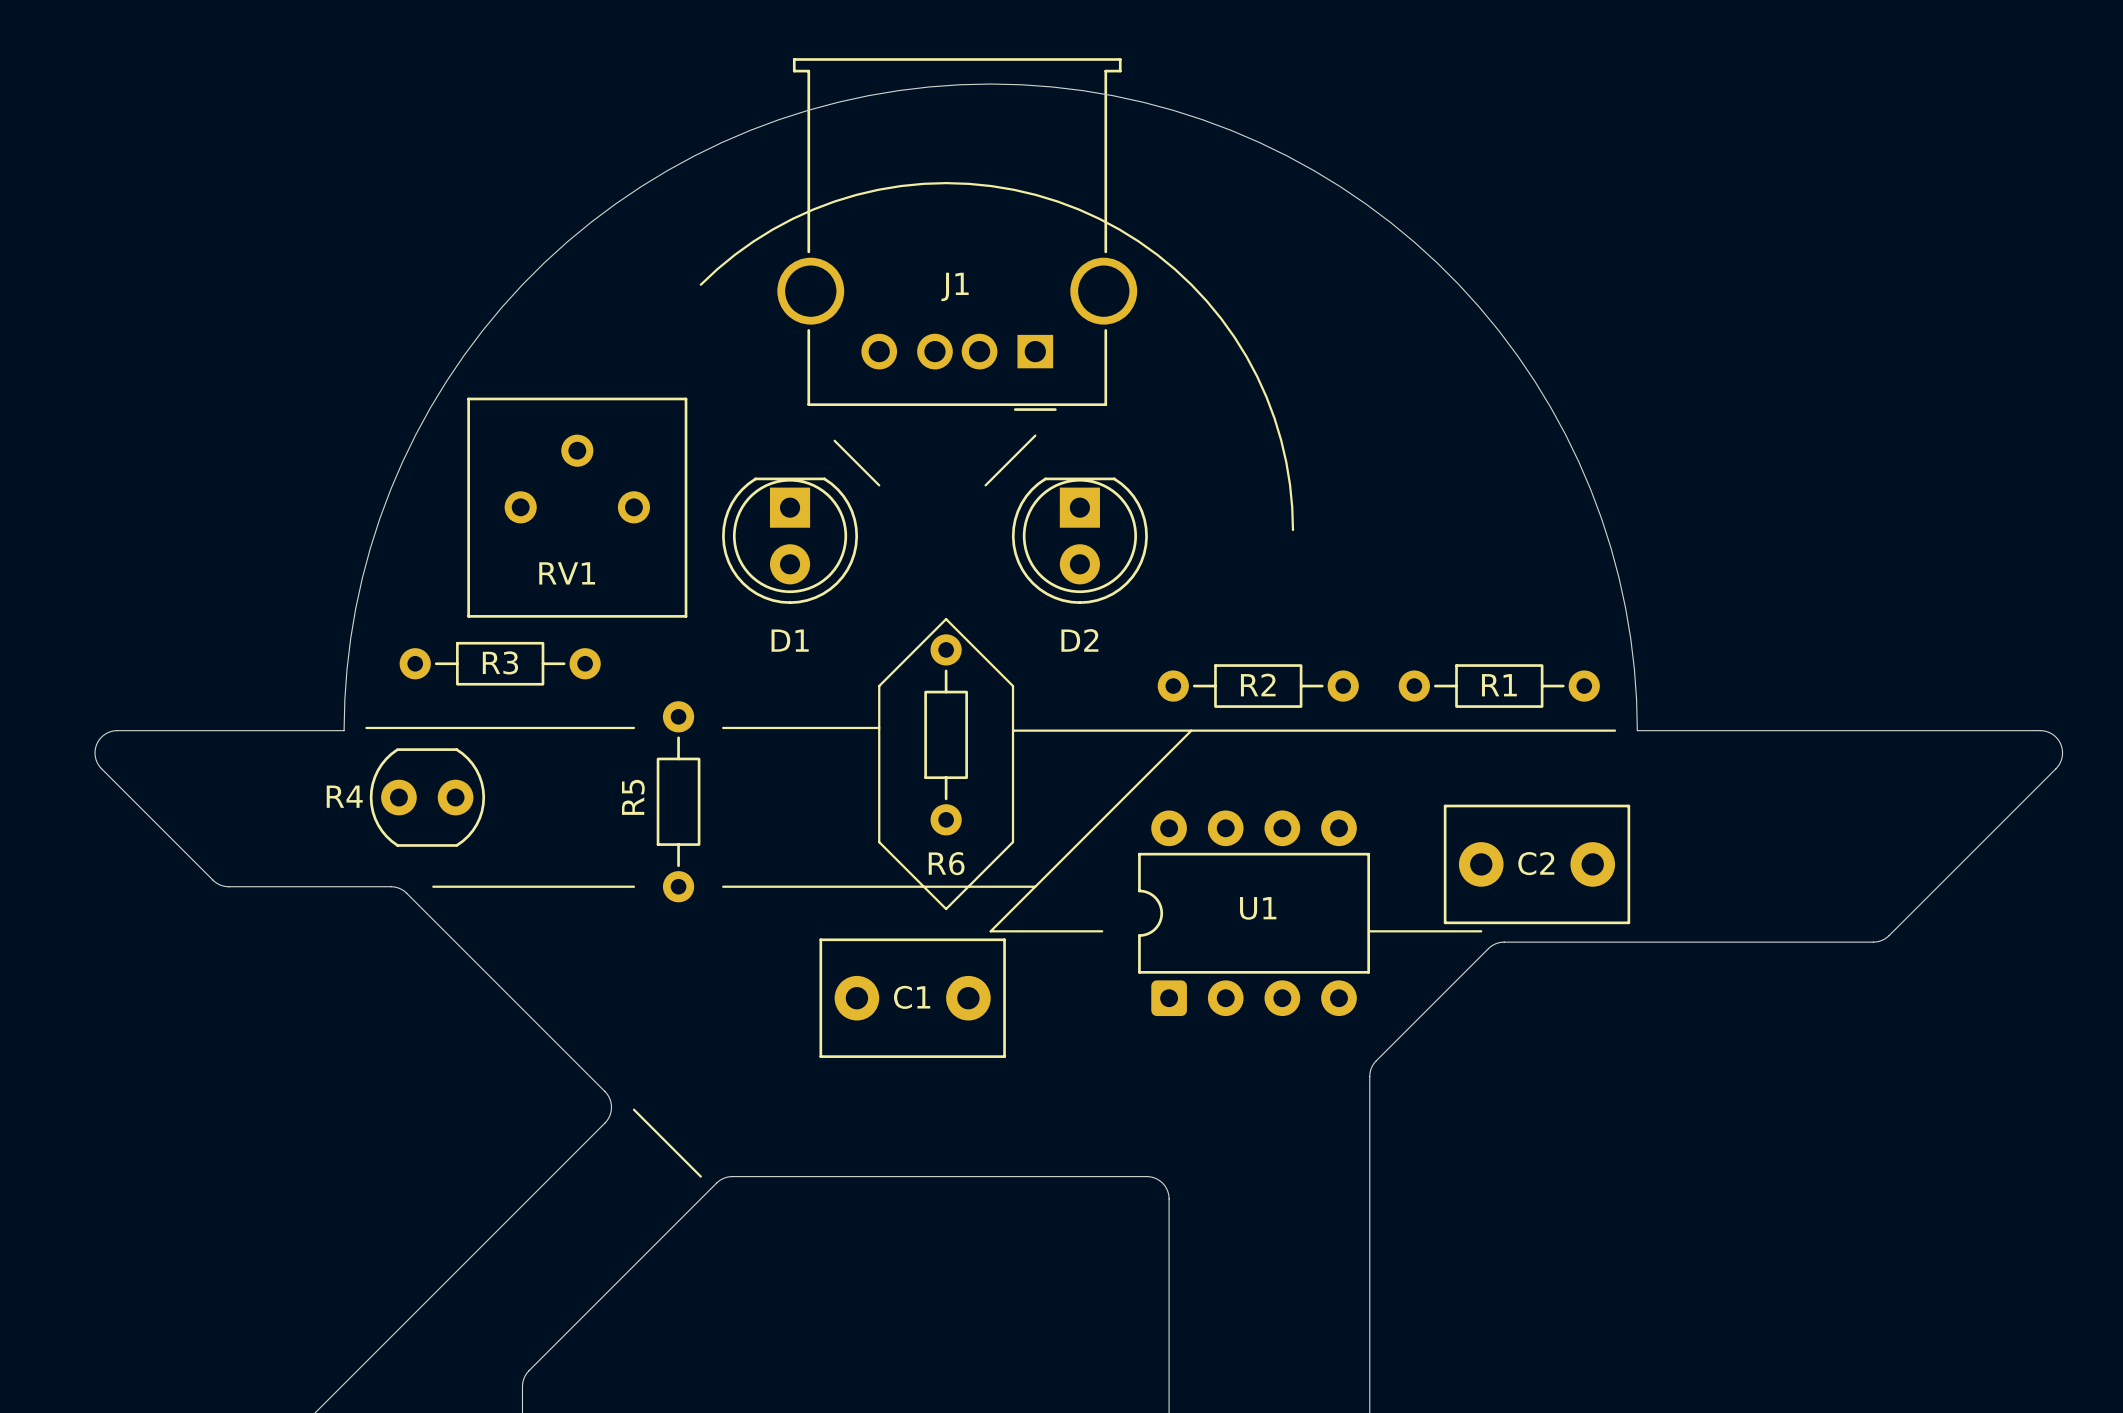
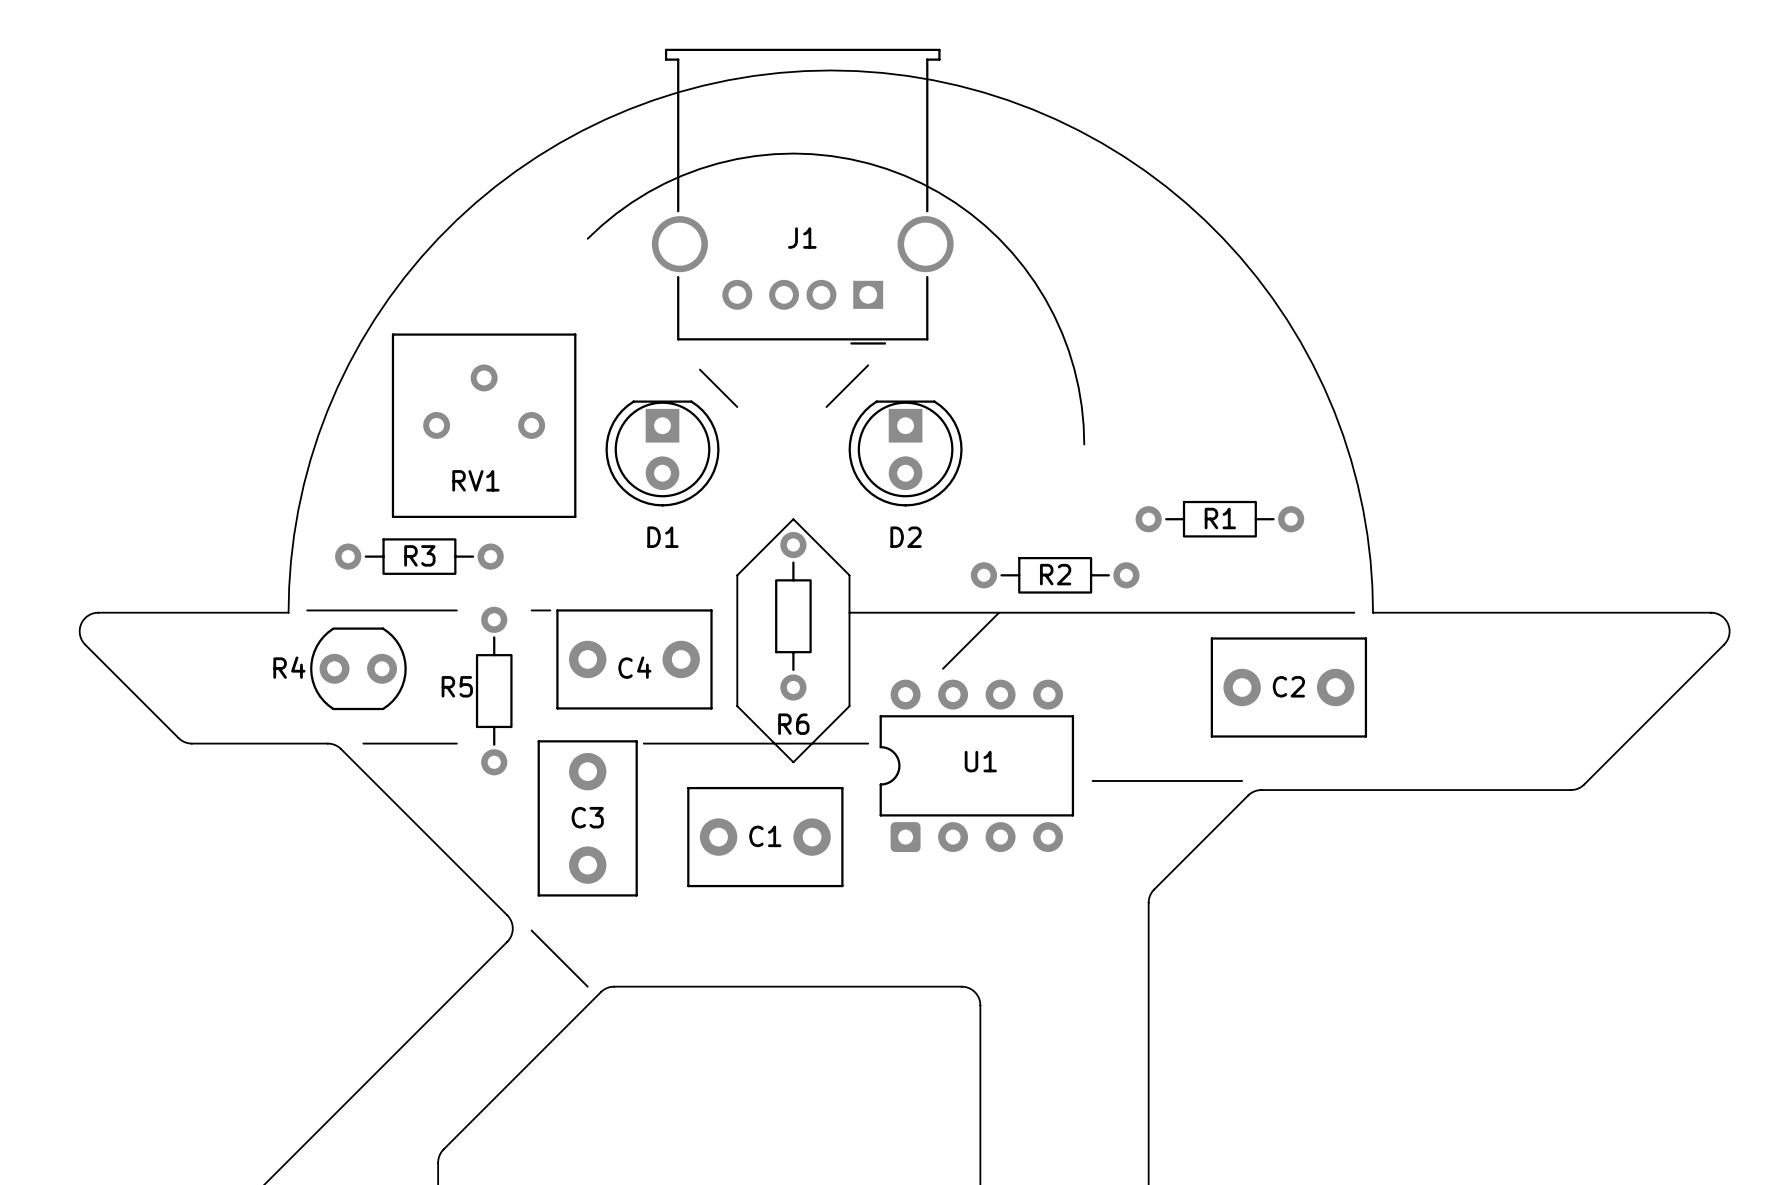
R1 position: (1499, 686) -> (1219, 519)
line: (544, 727) (633, 727) -> (550, 610) (531, 610)
line: (723, 727) (879, 727) -> none
C4: none -> (634, 659)
R5 name rotation: 0° (633, 797) -> 90° clockwise (457, 686)
line: (1124, 797) (990, 931) (1102, 931) -> none
R5 position: (678, 801) -> (494, 691)
C2 position: (1536, 864) -> (1288, 687)
line: (544, 886) (633, 886) -> none
line: (723, 886) (767, 886) -> none
U1 position: (1254, 913) -> (976, 765)
line: none -> (1092, 780) (1148, 780)
C3: none -> (587, 818)

